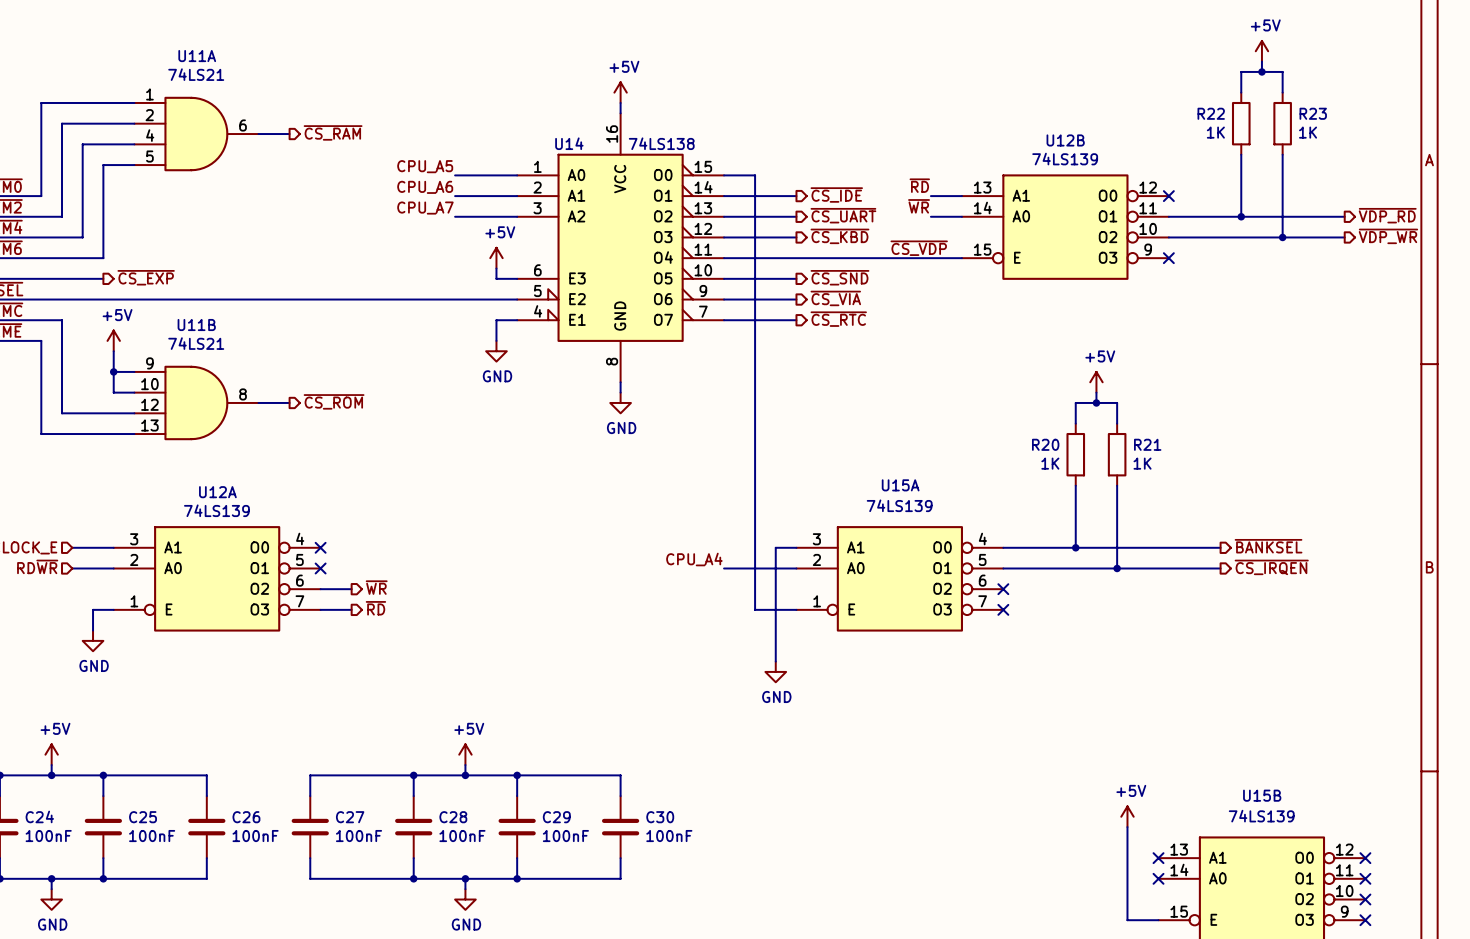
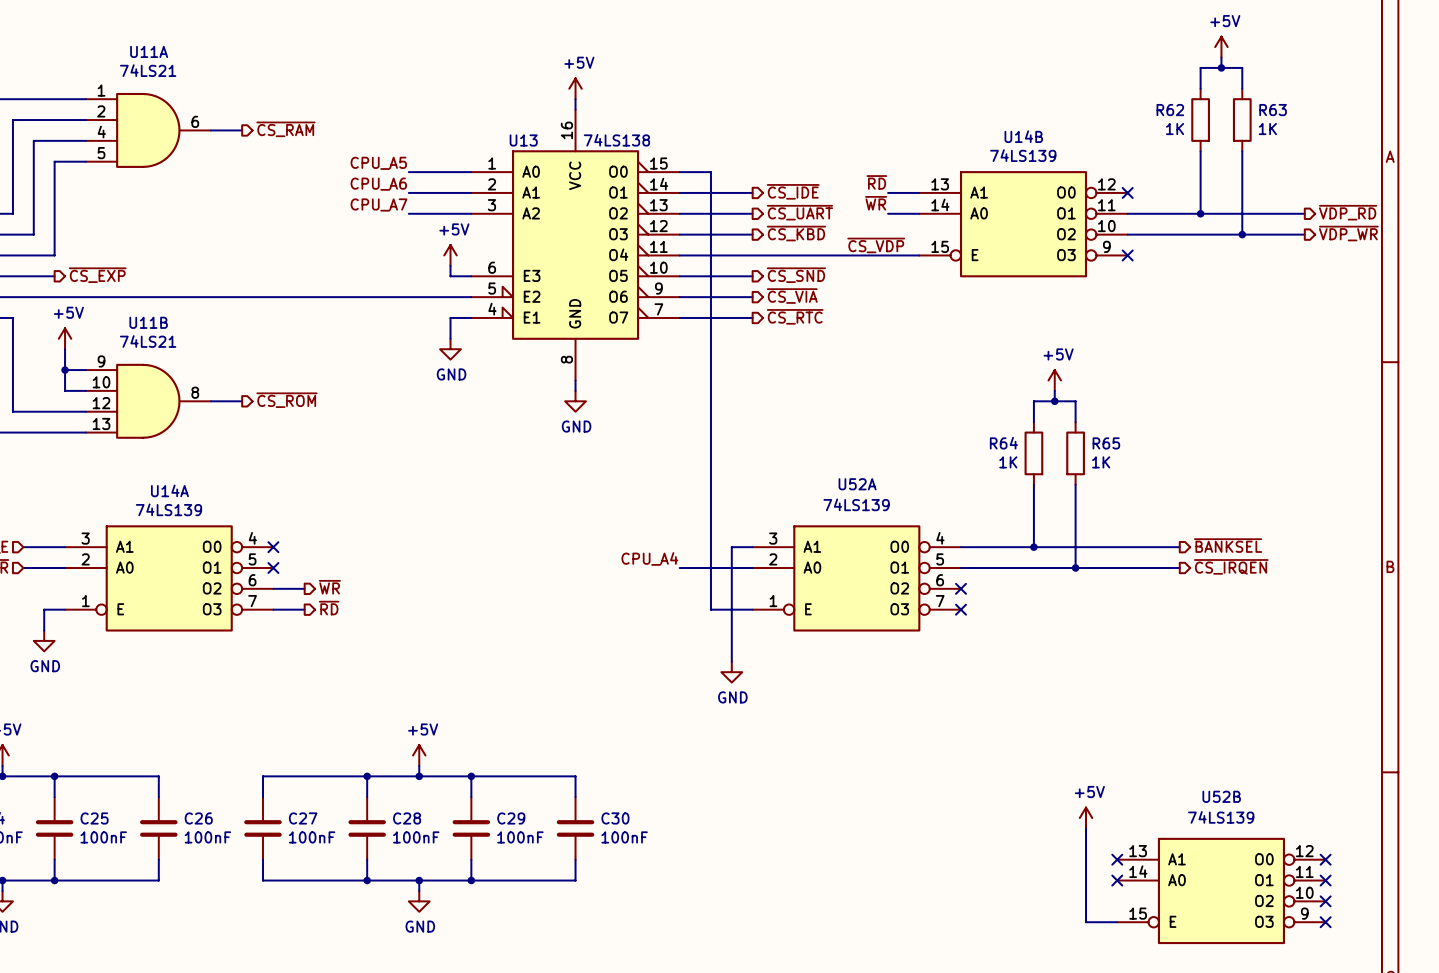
R22 name: R22 (1211, 113) -> R62 (1170, 110)
R23 name: R23 (1313, 113) -> R63 (1273, 110)
U12B name: U12B (1065, 140) -> U14B (1023, 136)
U14 name: U14 (569, 143) -> U13 (523, 140)
R20 name: R20 (1045, 444) -> R64 (1003, 443)
R21 name: R21 (1147, 444) -> R65 (1106, 443)
U15A name: U15A (900, 485) -> U52A (857, 484)
U12A name: U12A (217, 492) -> U14A (169, 490)
U15B name: U15B (1262, 795) -> U52B (1221, 796)

